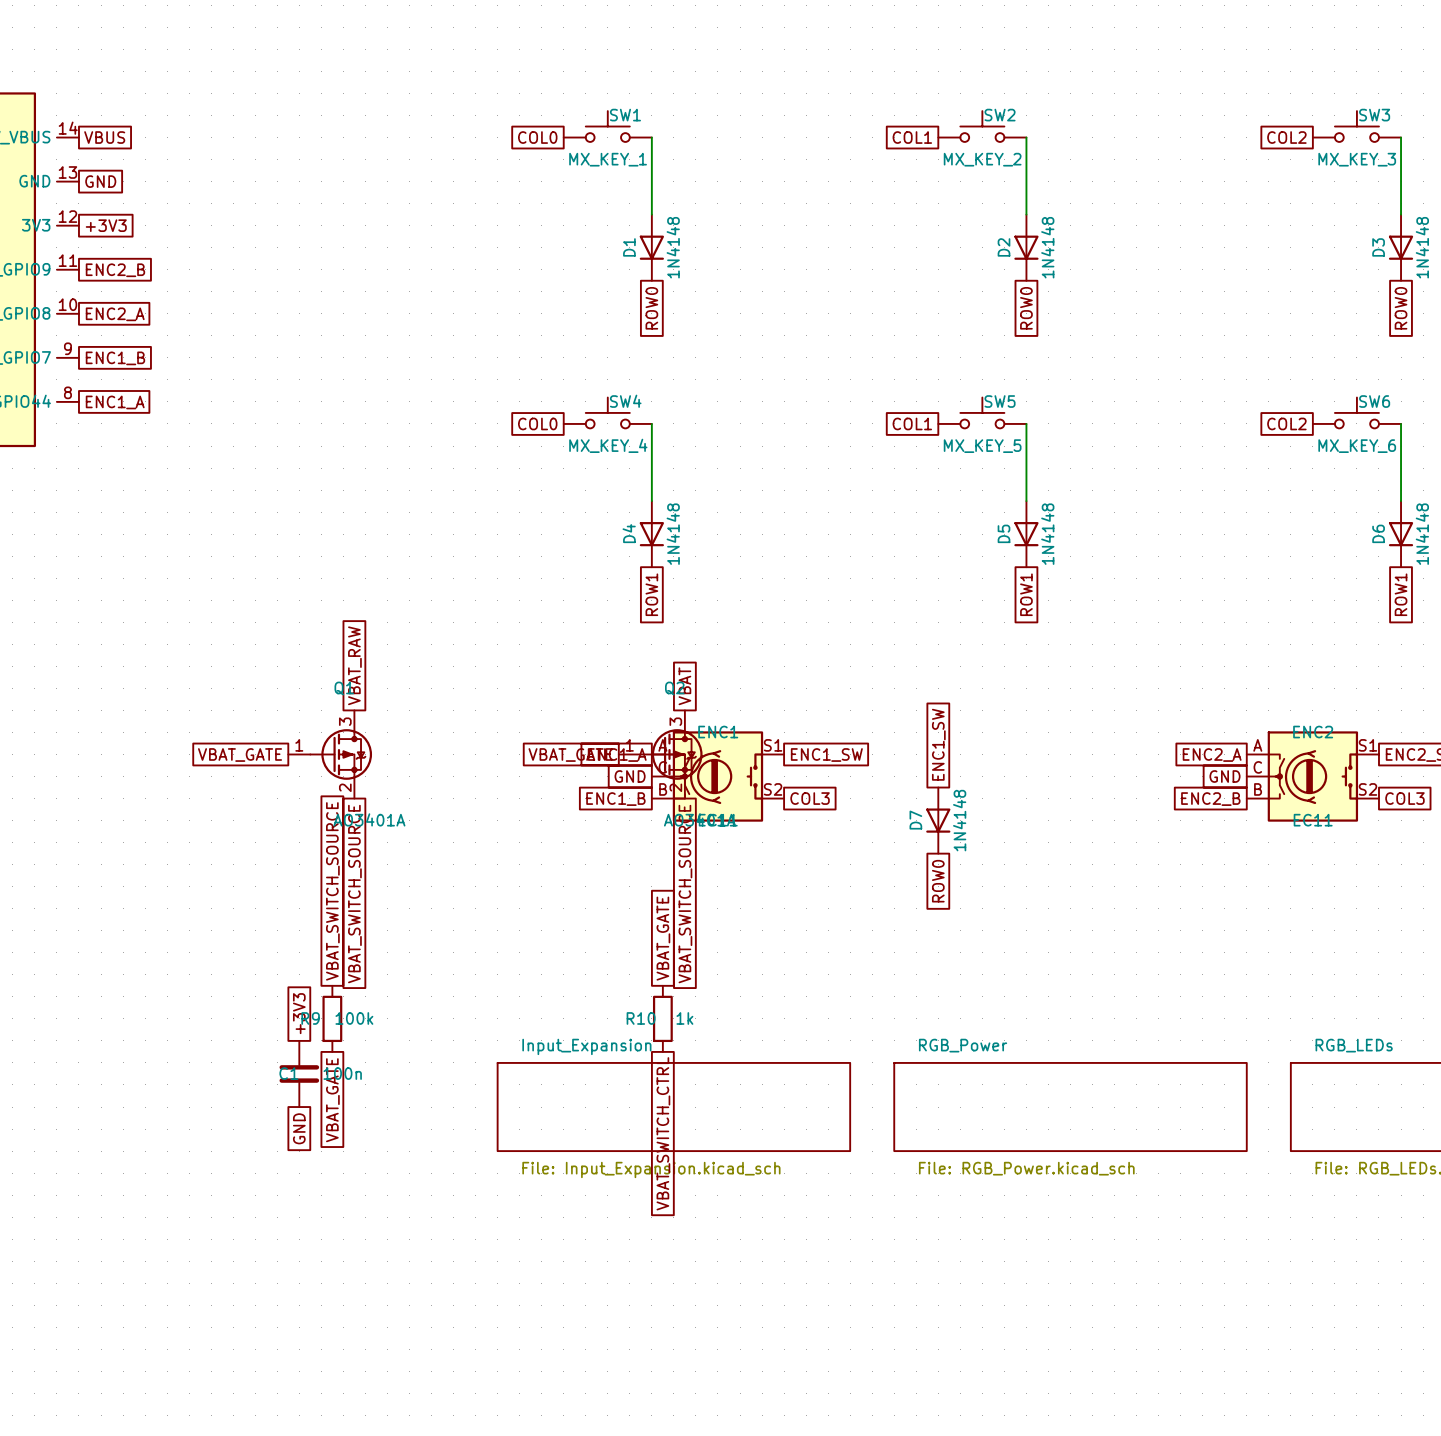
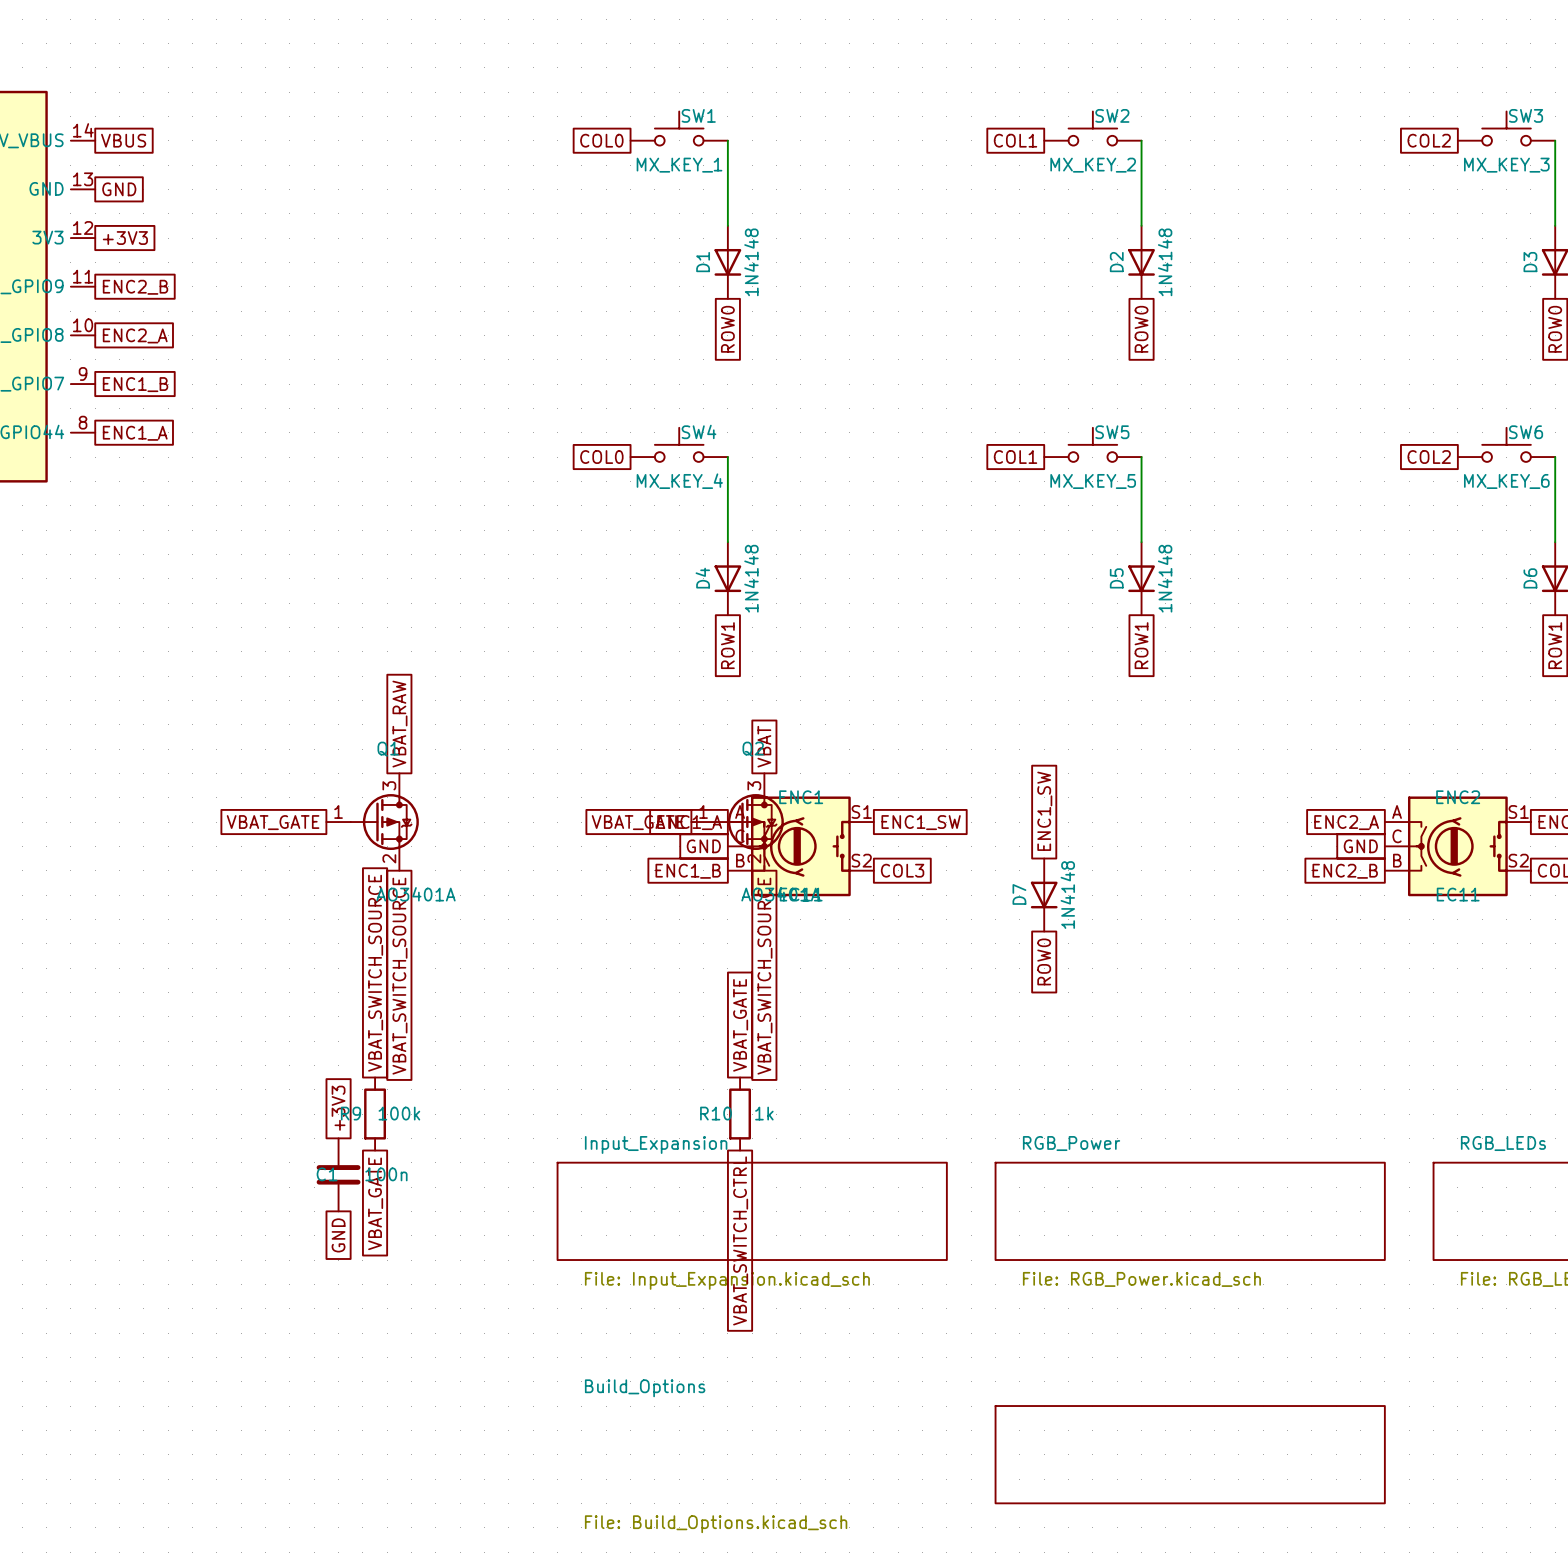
sheet Build_Options: none -> File: Build_Options.kicad_sch (1190, 1454)

